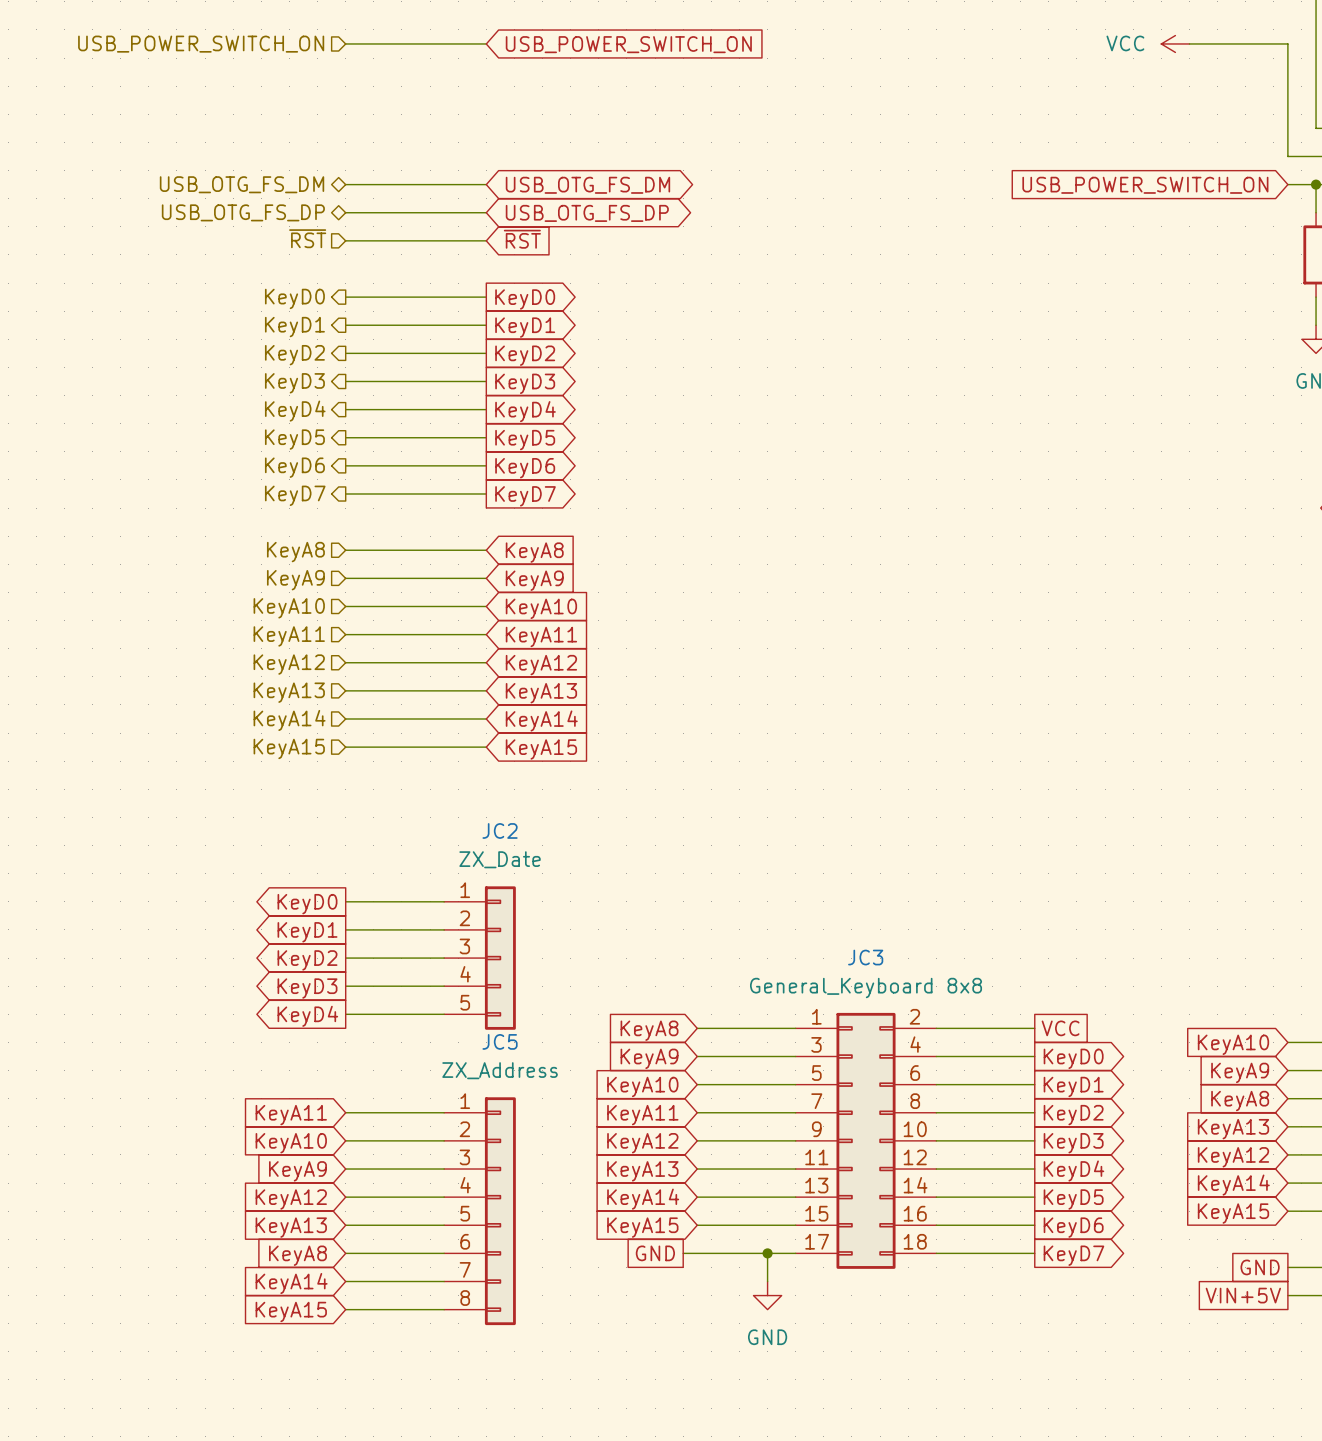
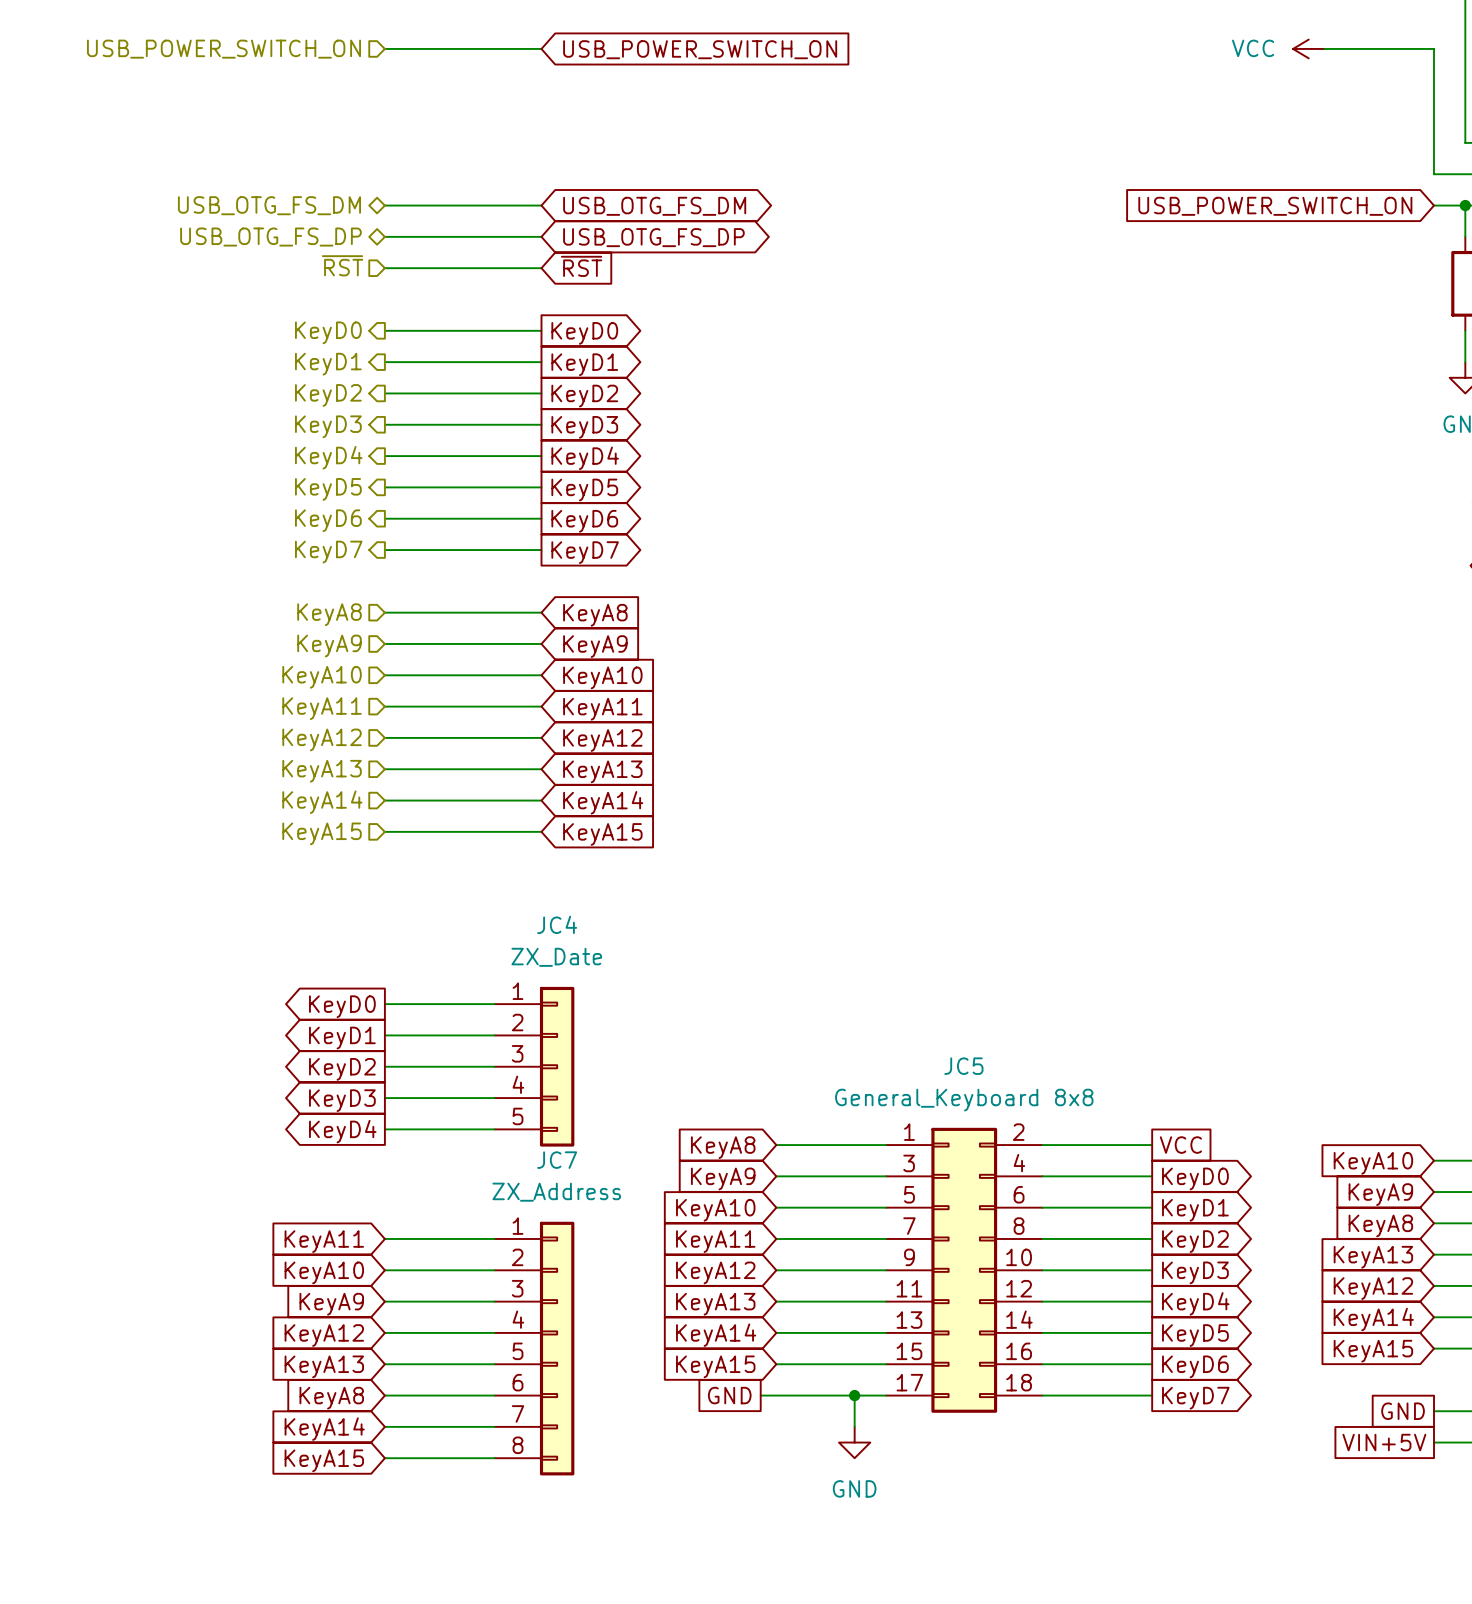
JC2 name: JC2 (500, 830) -> JC4 (557, 924)
JC3 name: JC3 (865, 957) -> JC5 (963, 1066)
JC5 name: JC5 (500, 1041) -> JC7 (557, 1160)

